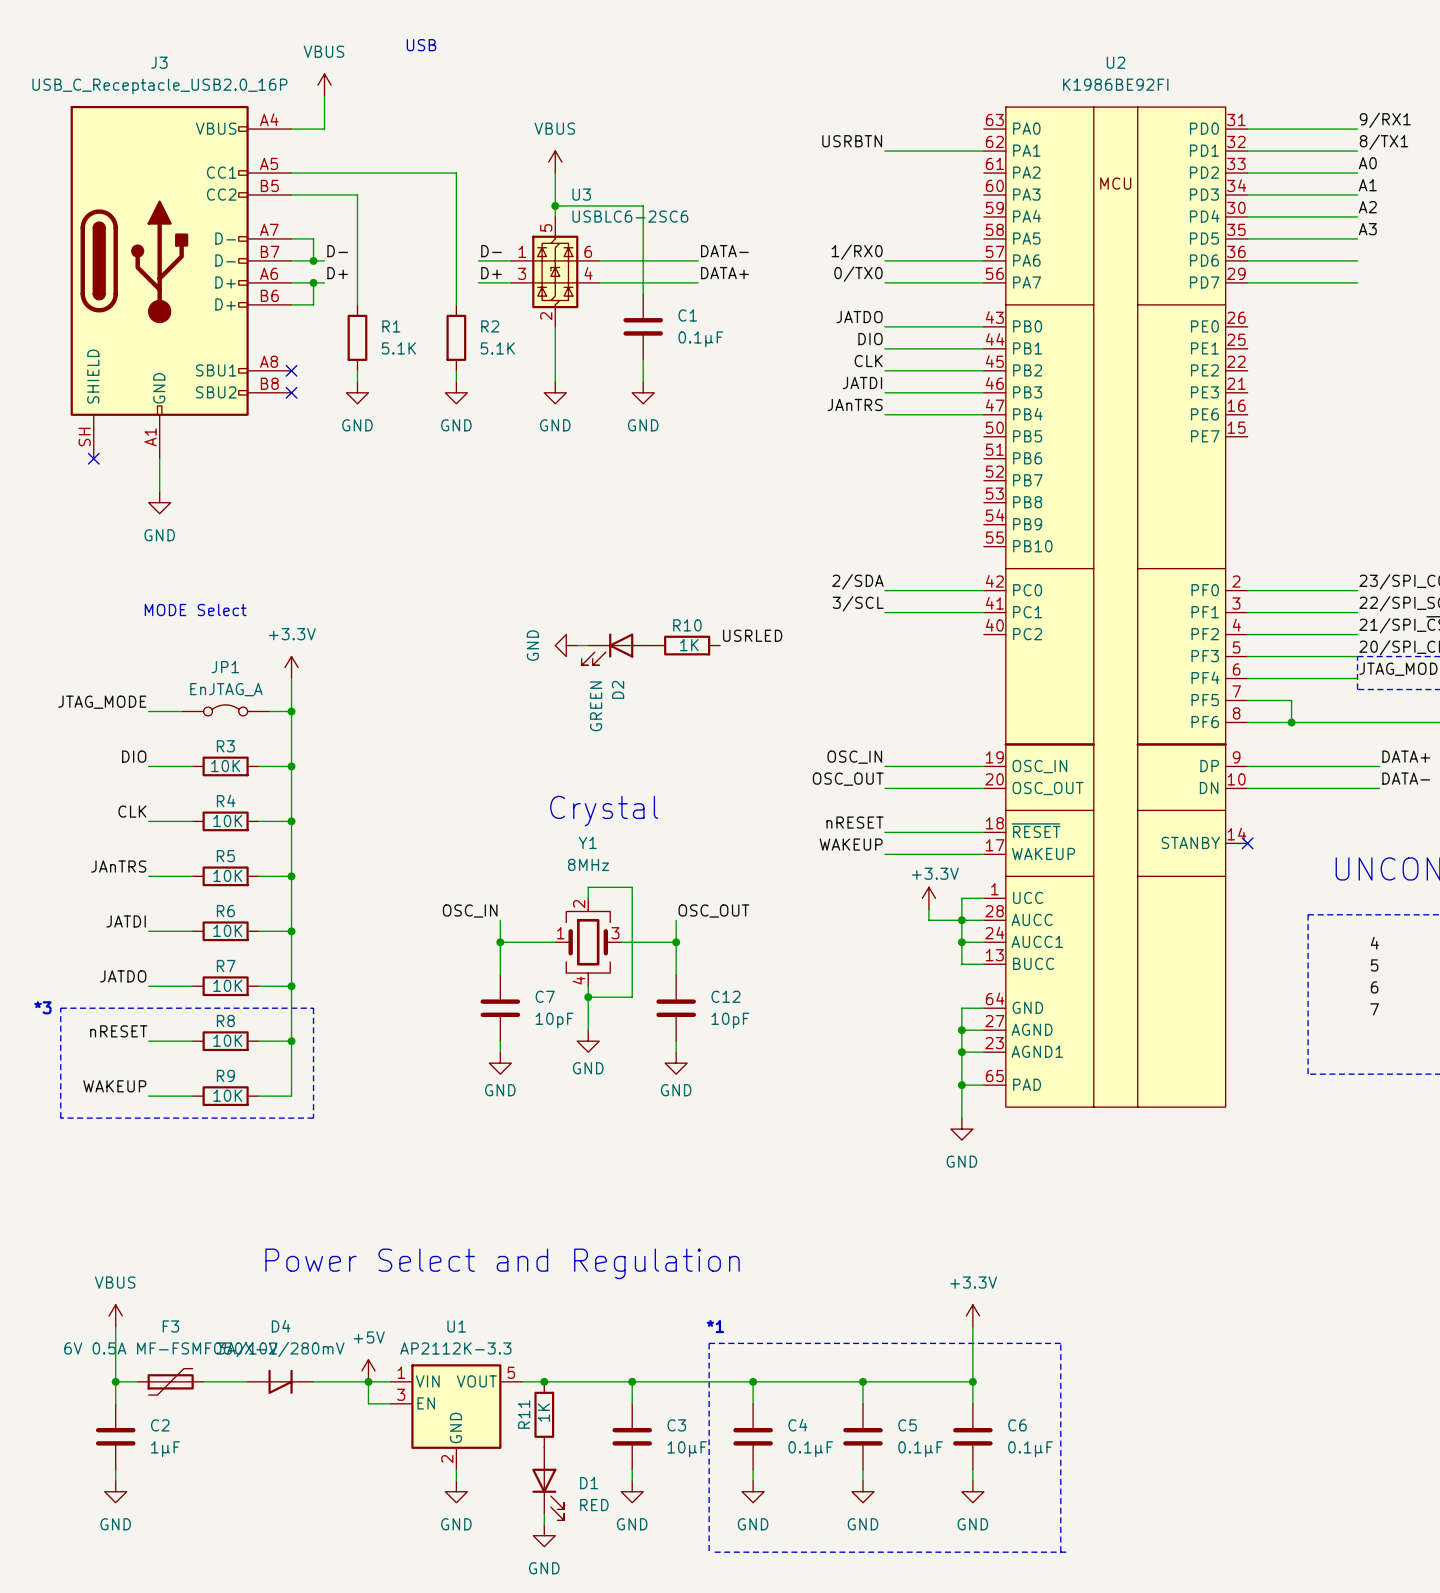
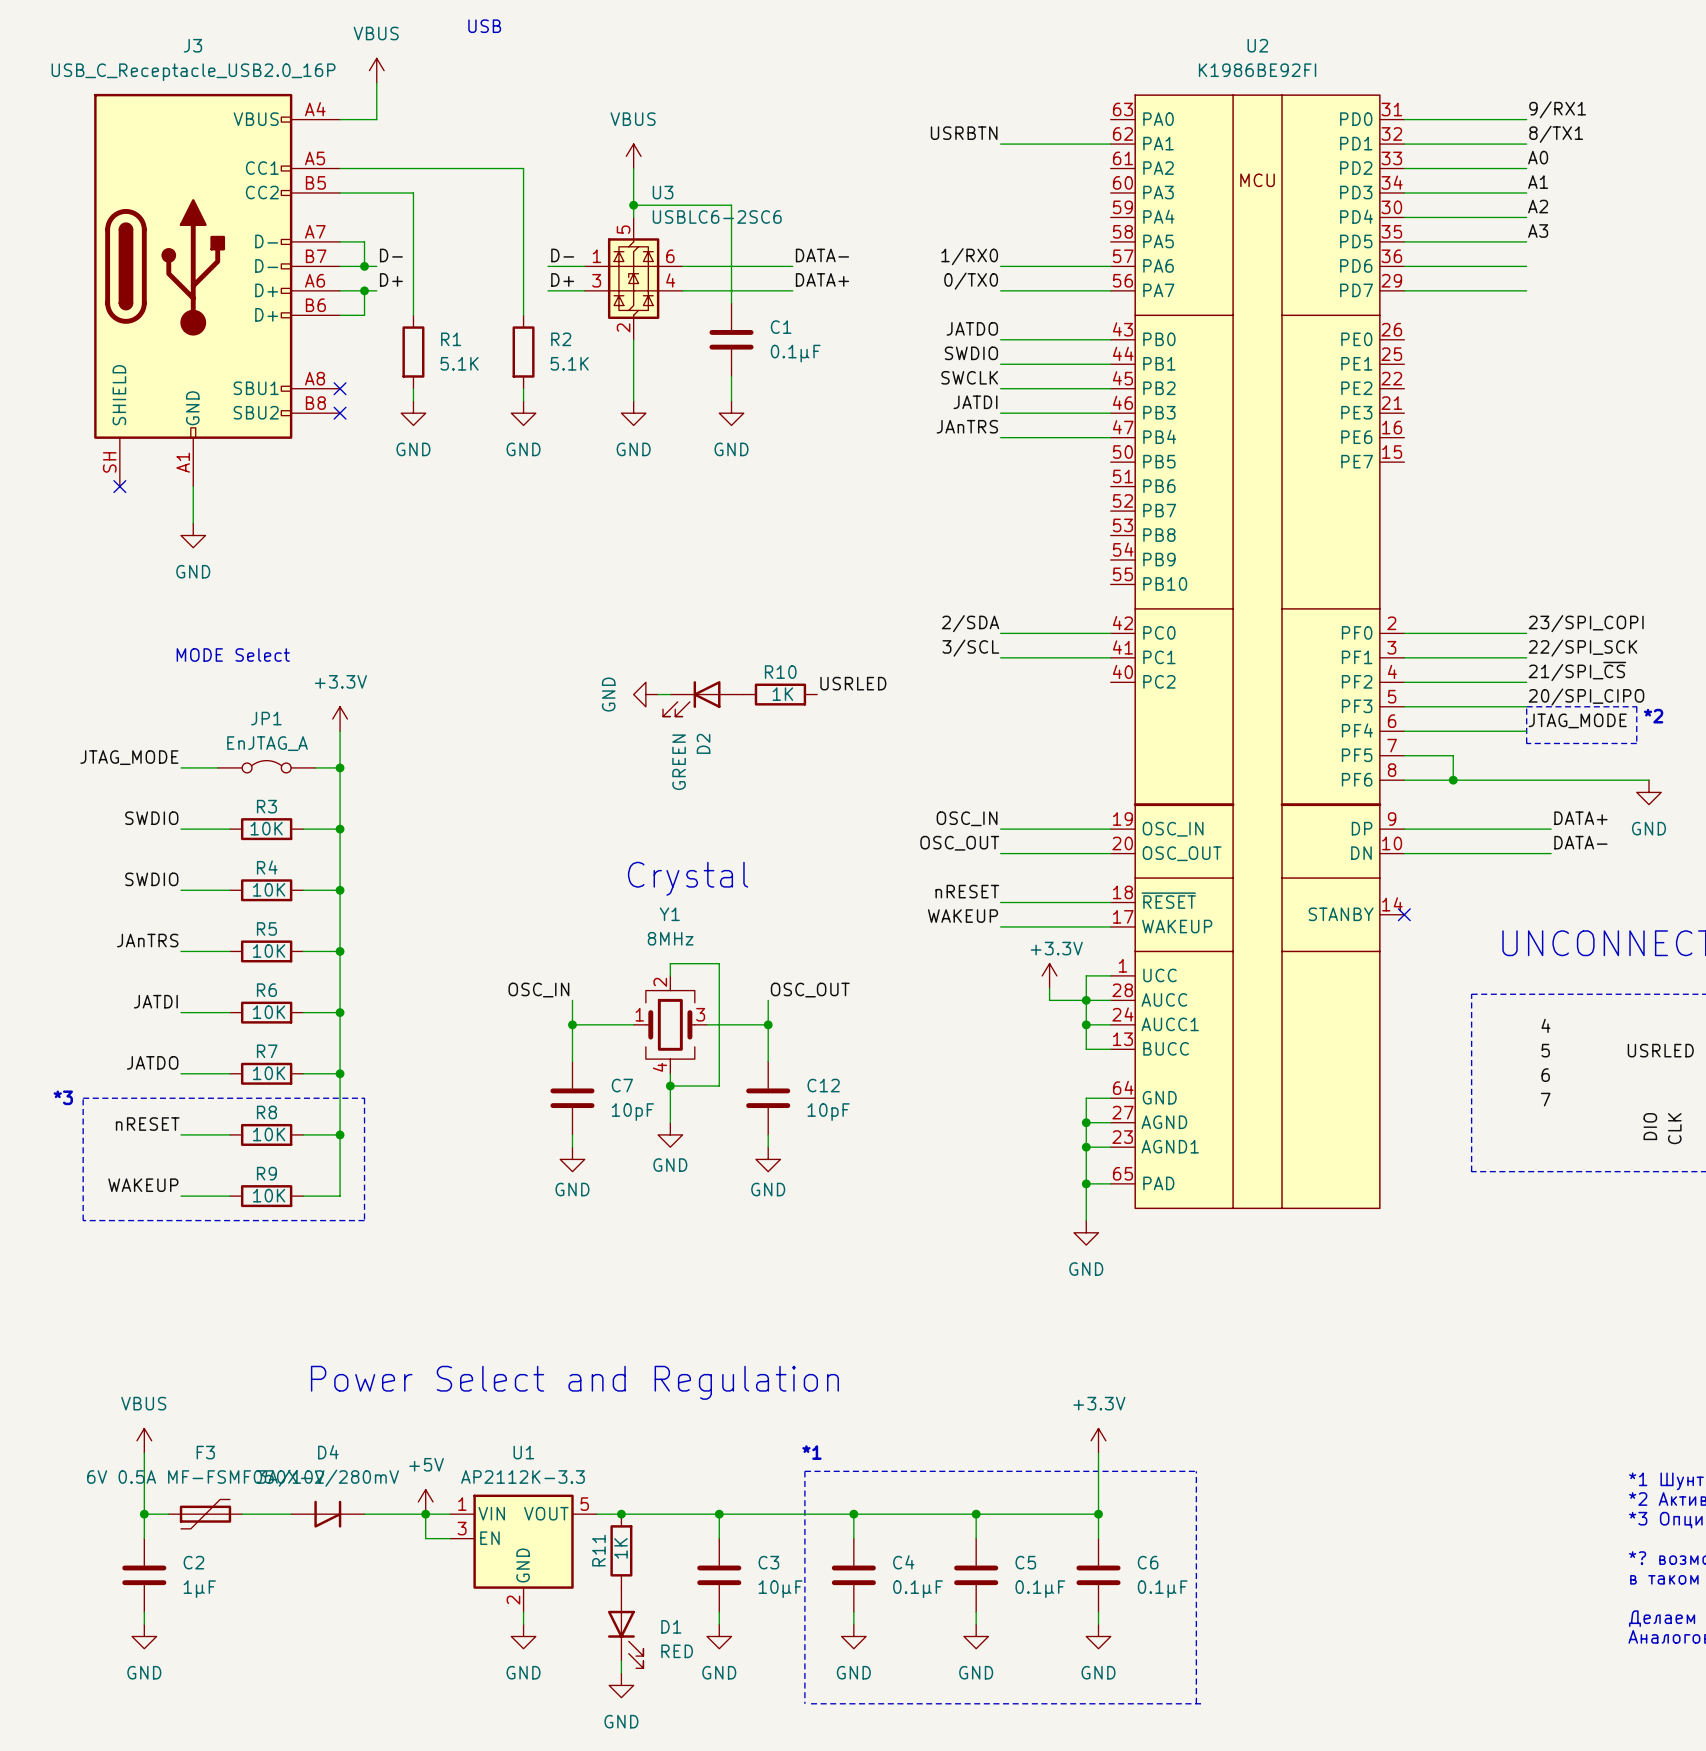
label: DIO (870, 339) -> SWDIO (971, 353)
label: CLK (868, 361) -> SWCLK (969, 377)
label: DIO (134, 756) -> SWDIO (151, 818)
label: CLK (132, 811) -> SWDIO (151, 879)

